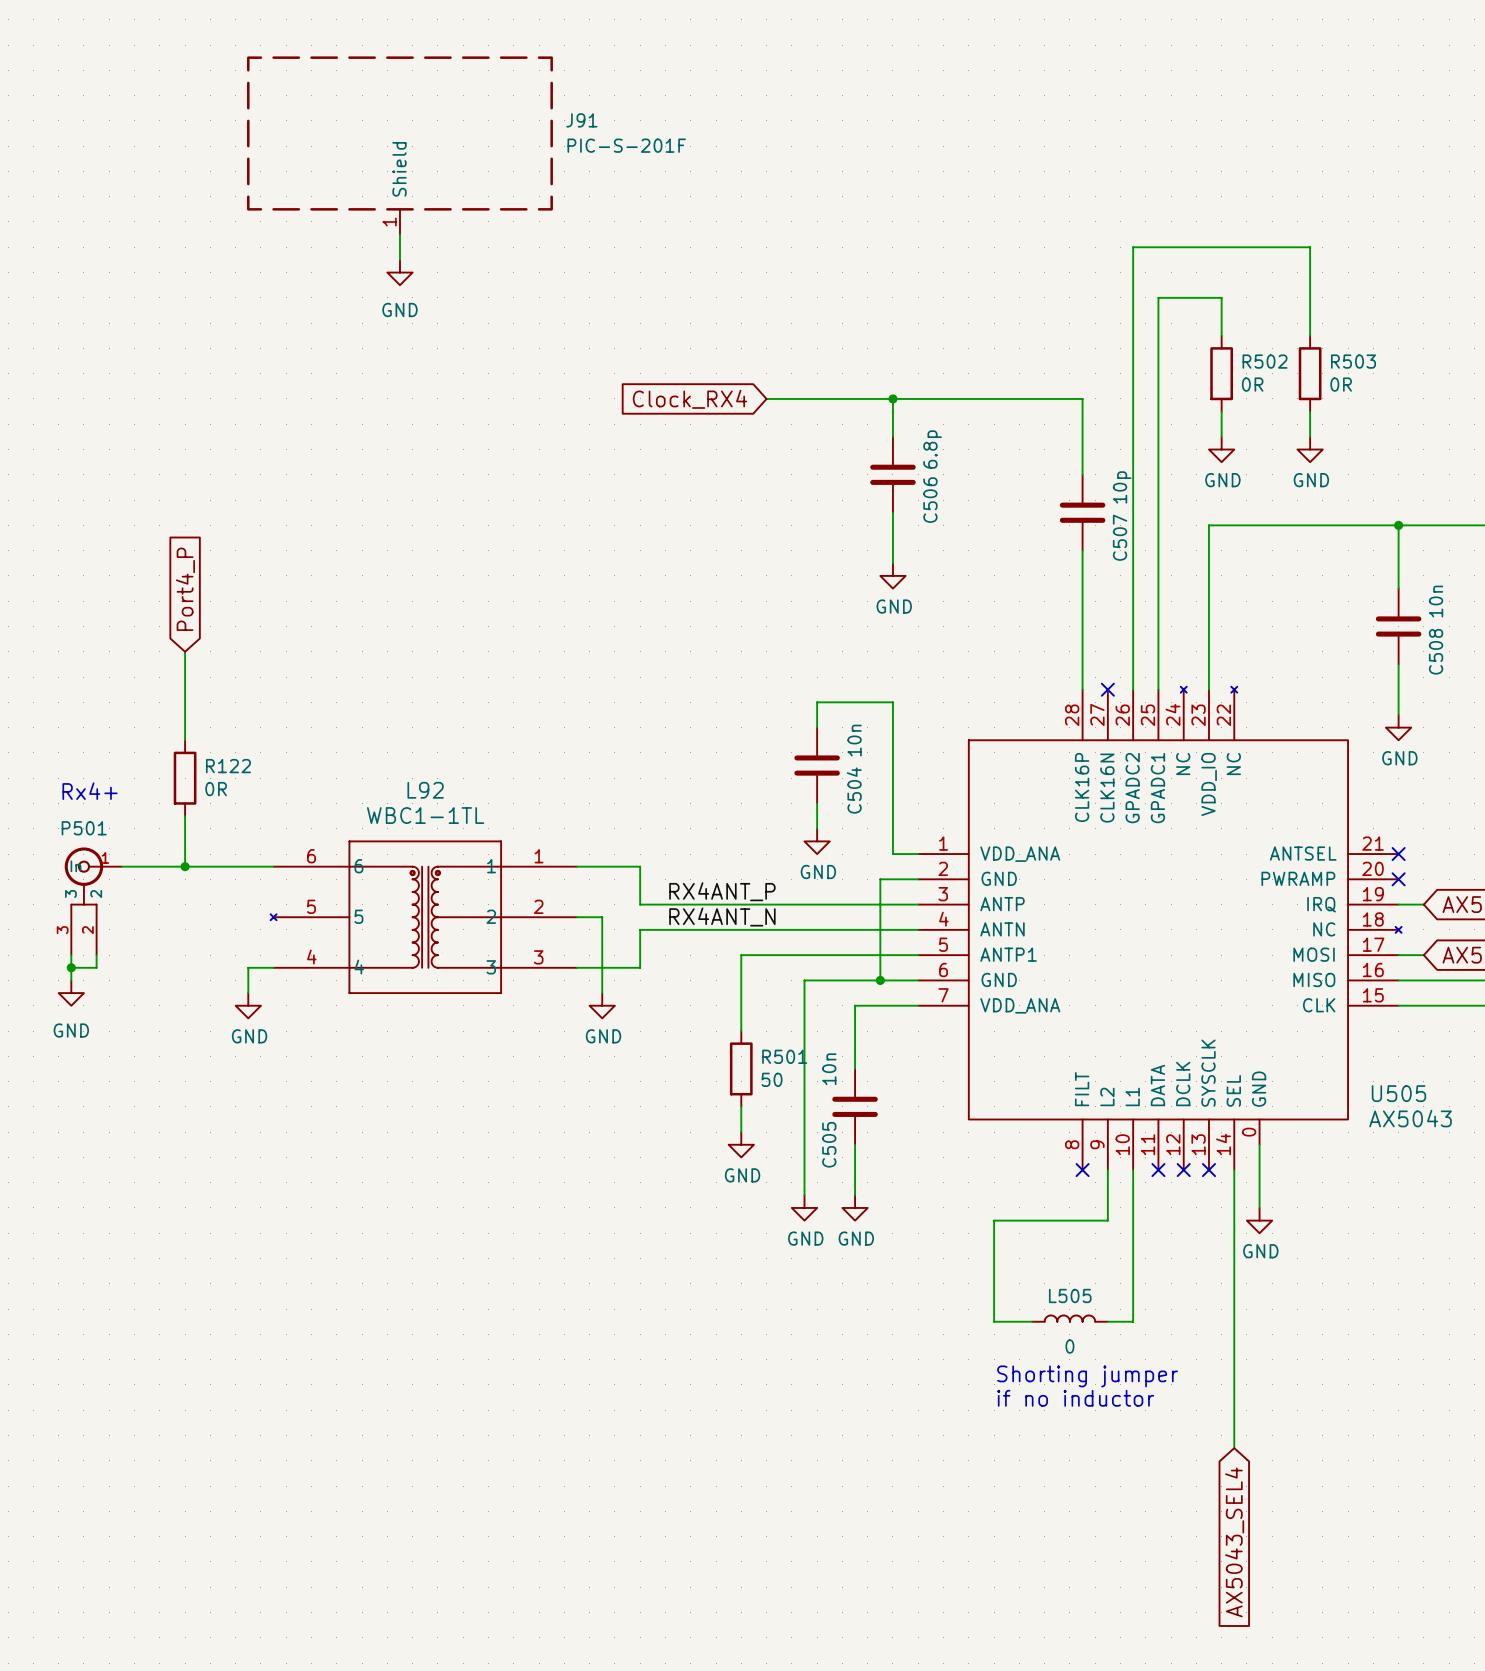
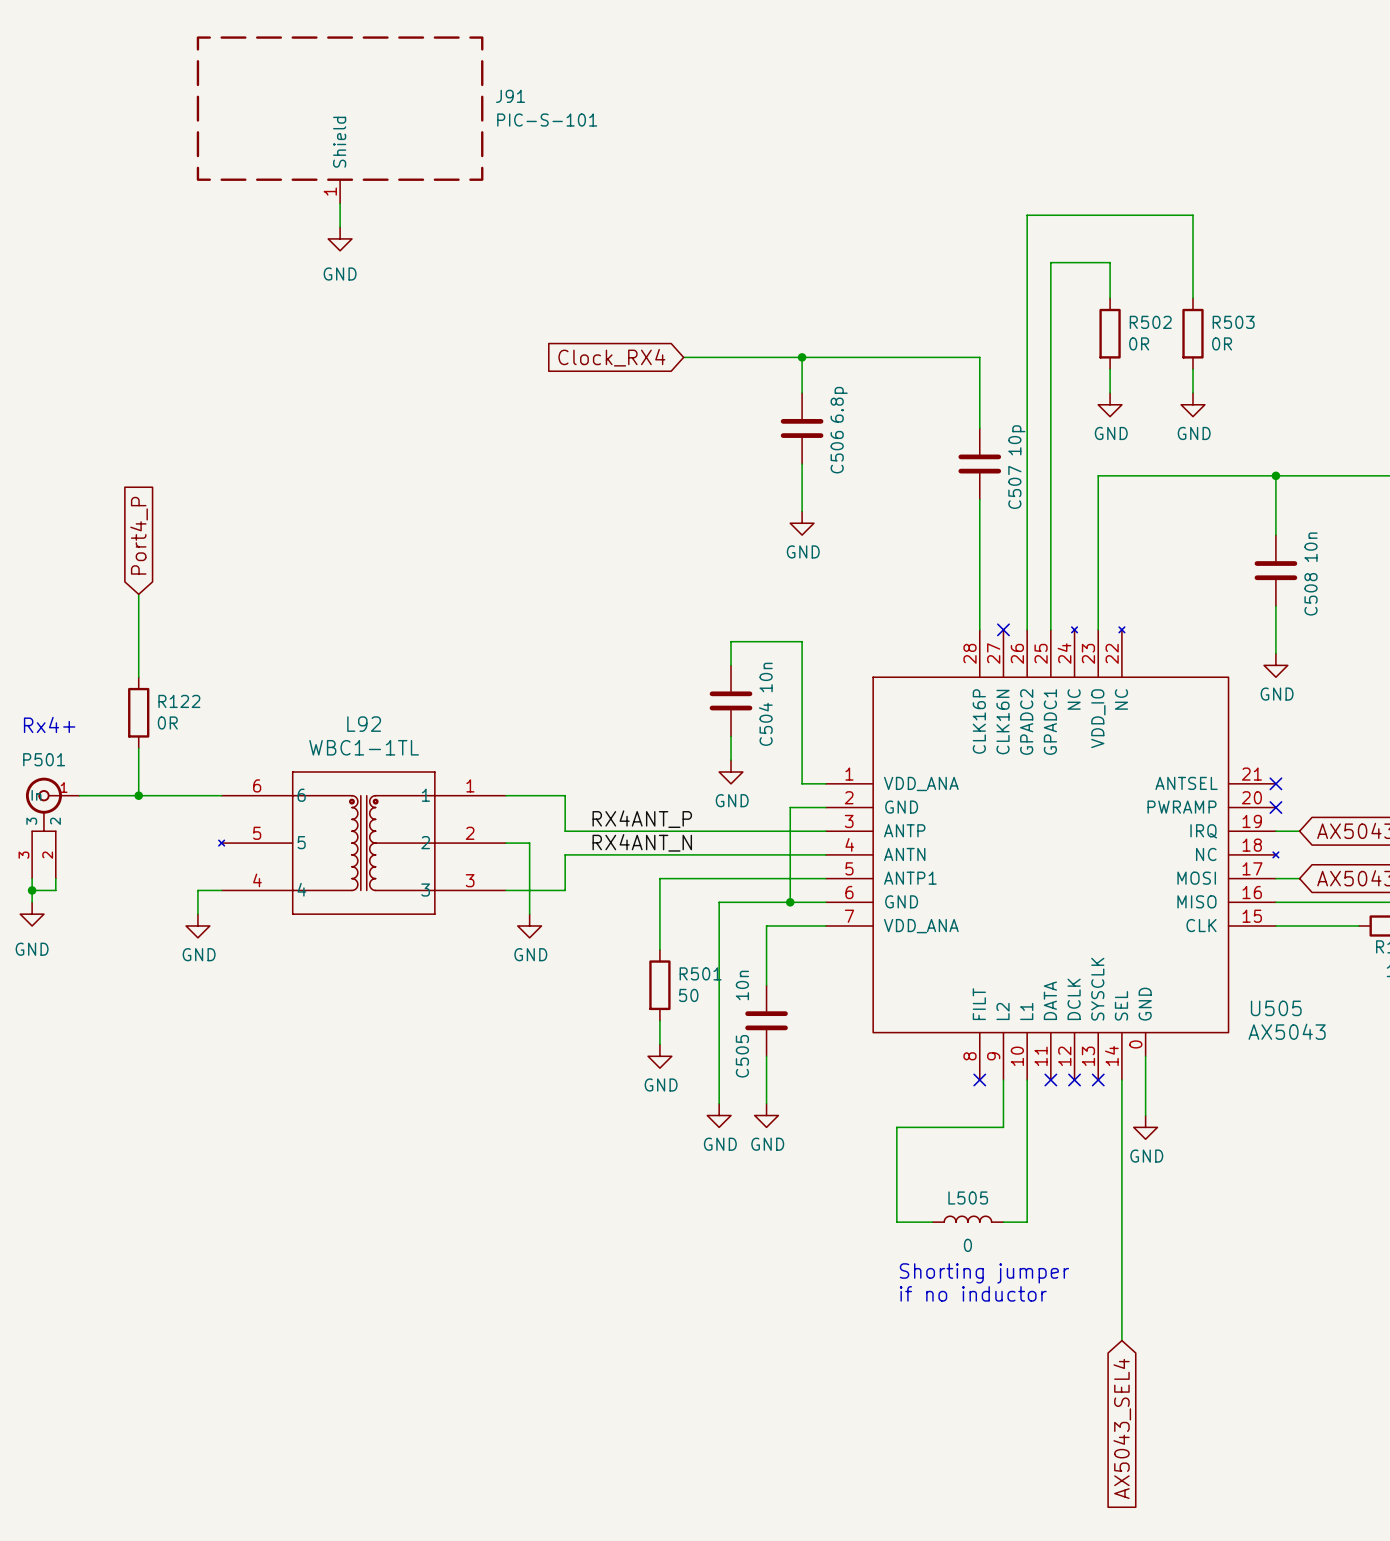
J91 value: PIC-S-201F (626, 145) -> PIC-S-101 (547, 120)

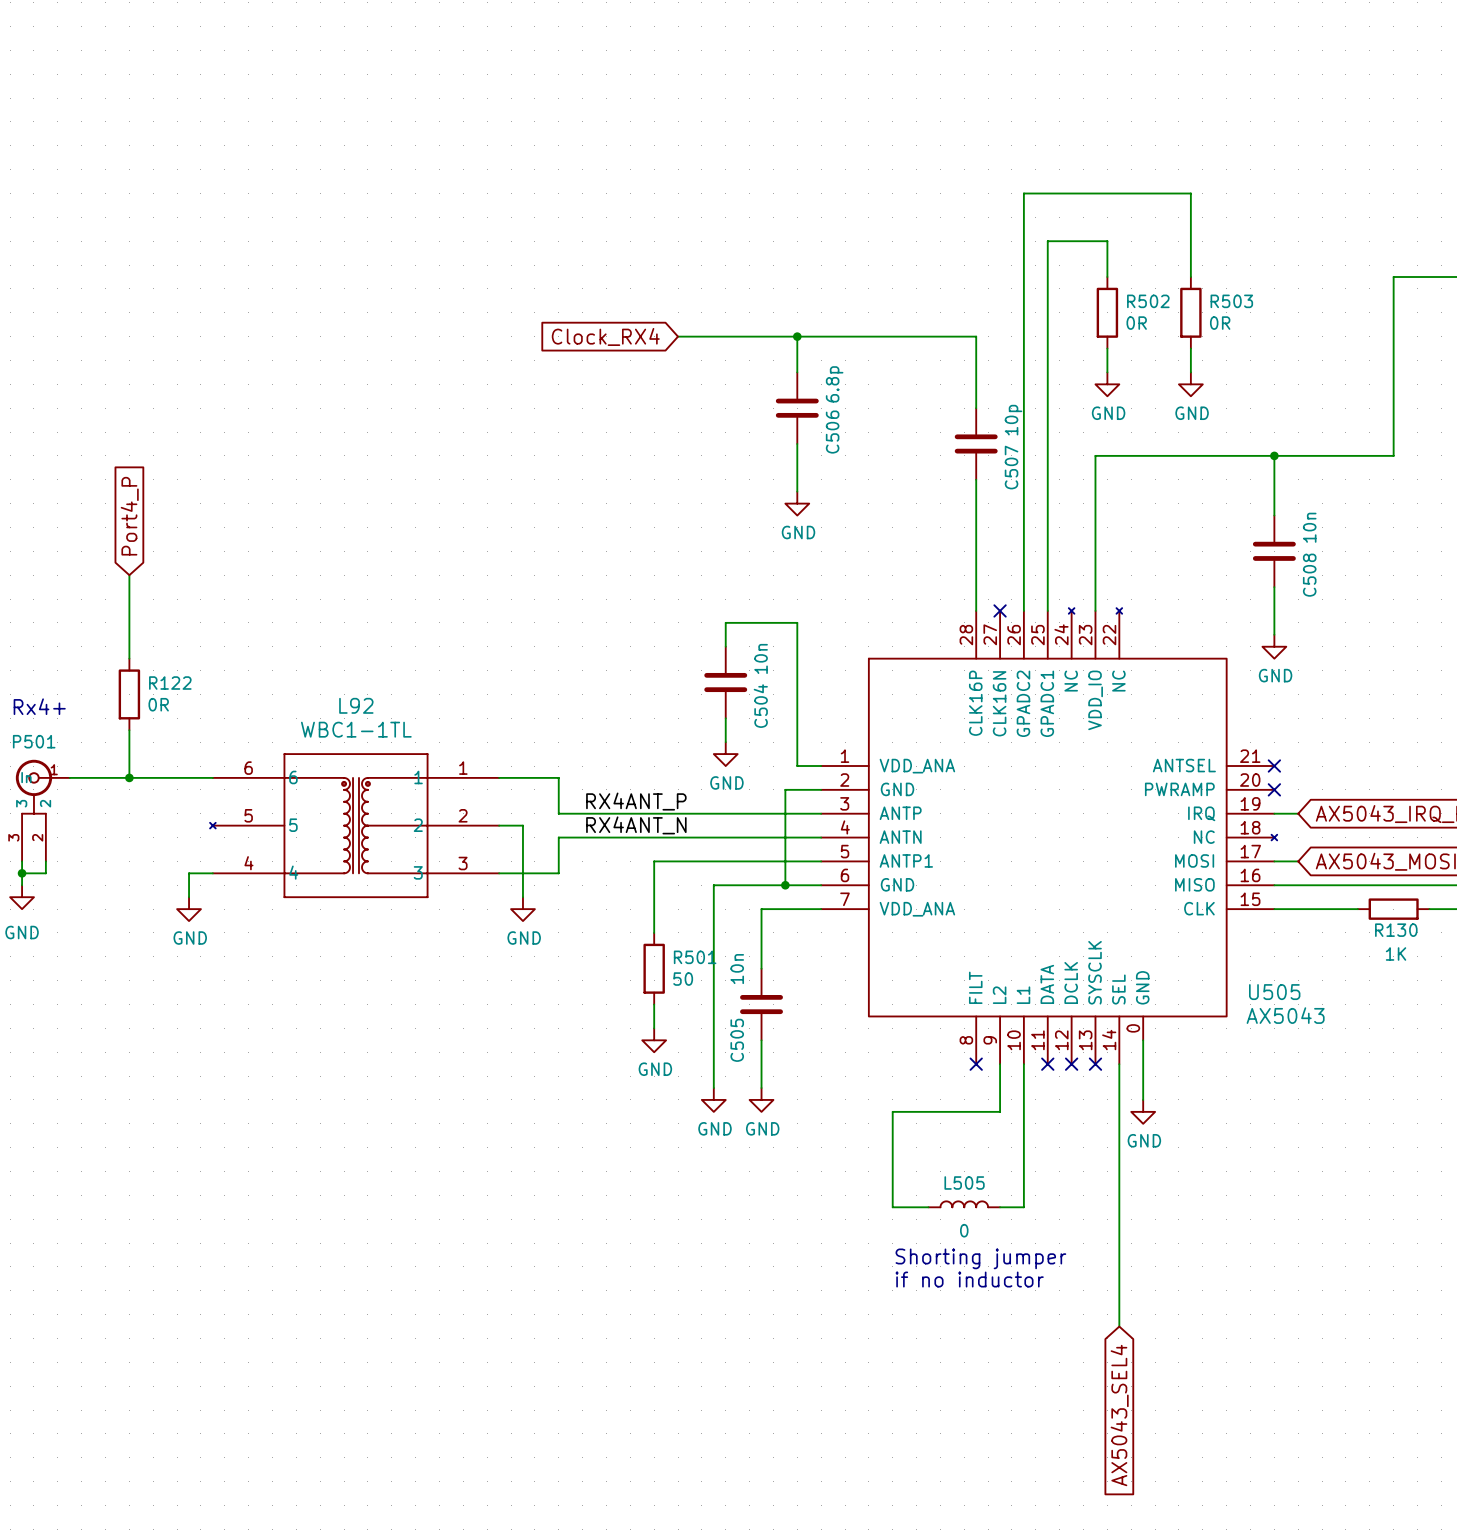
J91: PIC-S-101 (340, 119) -> none
wire: (340, 203) (340, 227) -> none
power symbol: GND (340, 238) -> none

